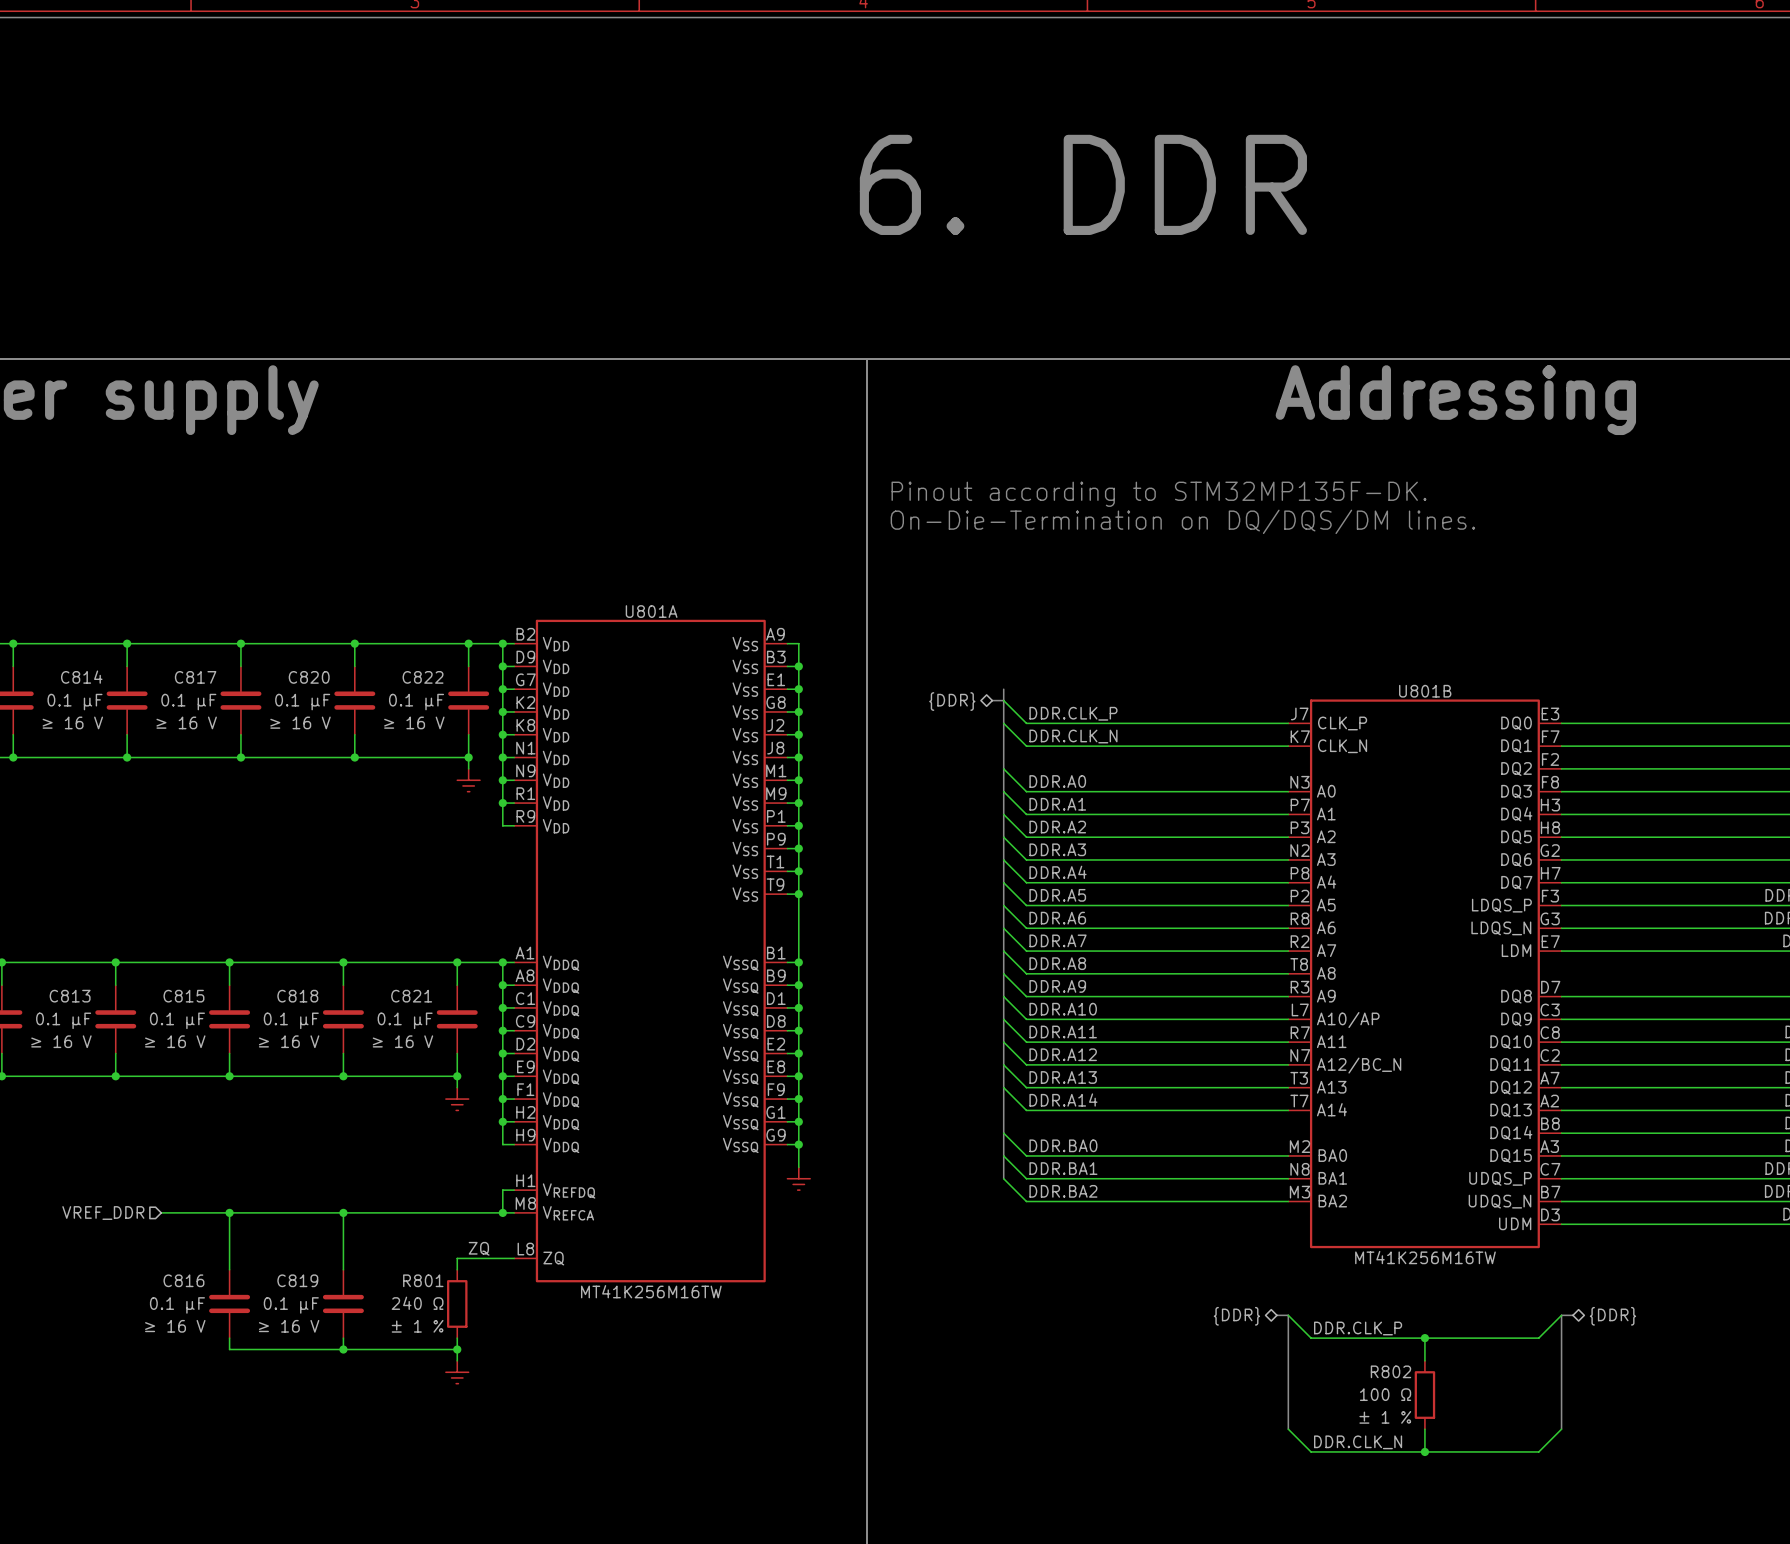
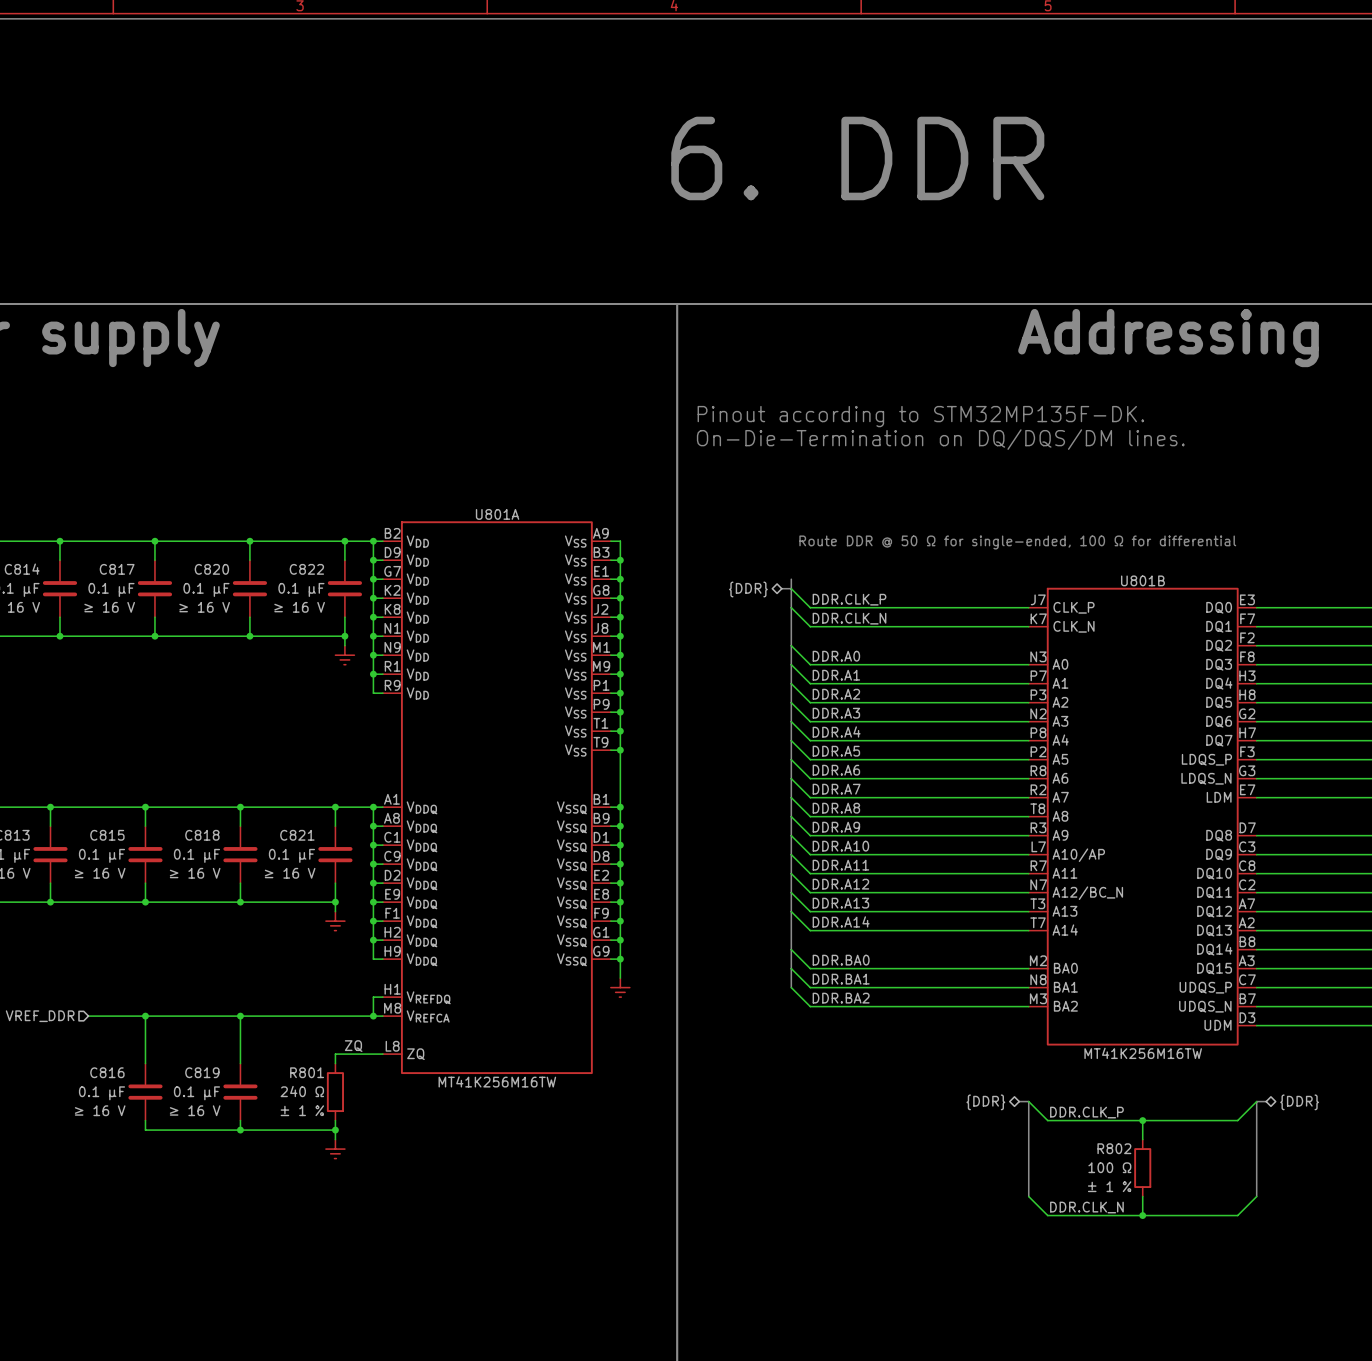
text: none -> Route DDR @ 50 Ω for single-ended, 100 Ω for differential (1017, 542)

